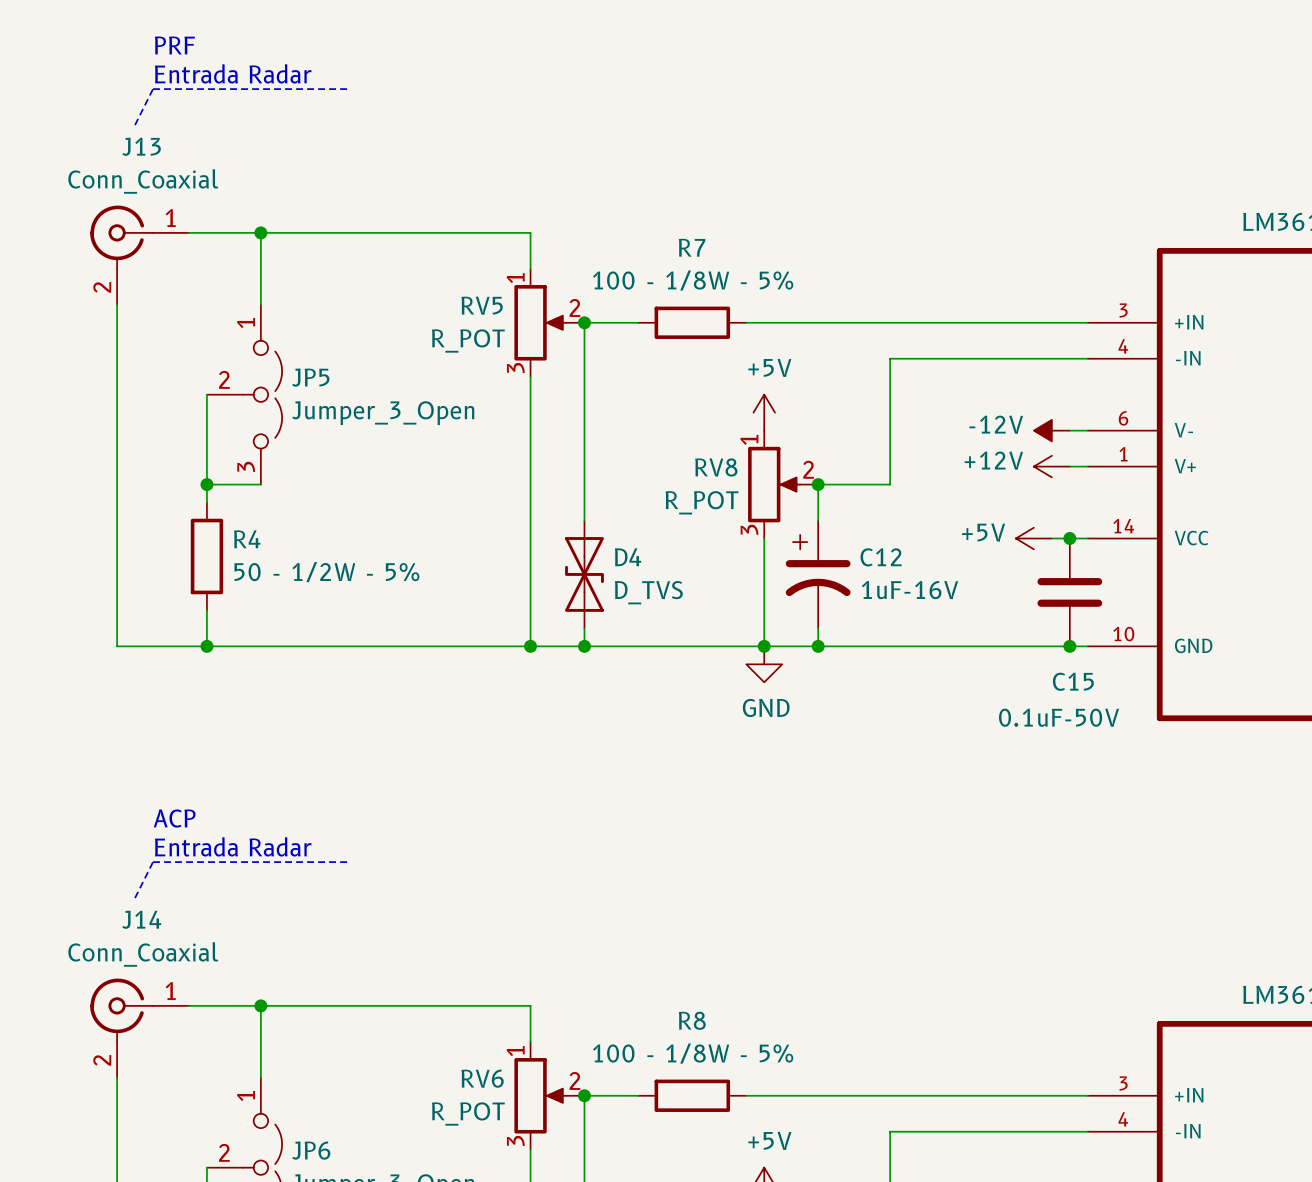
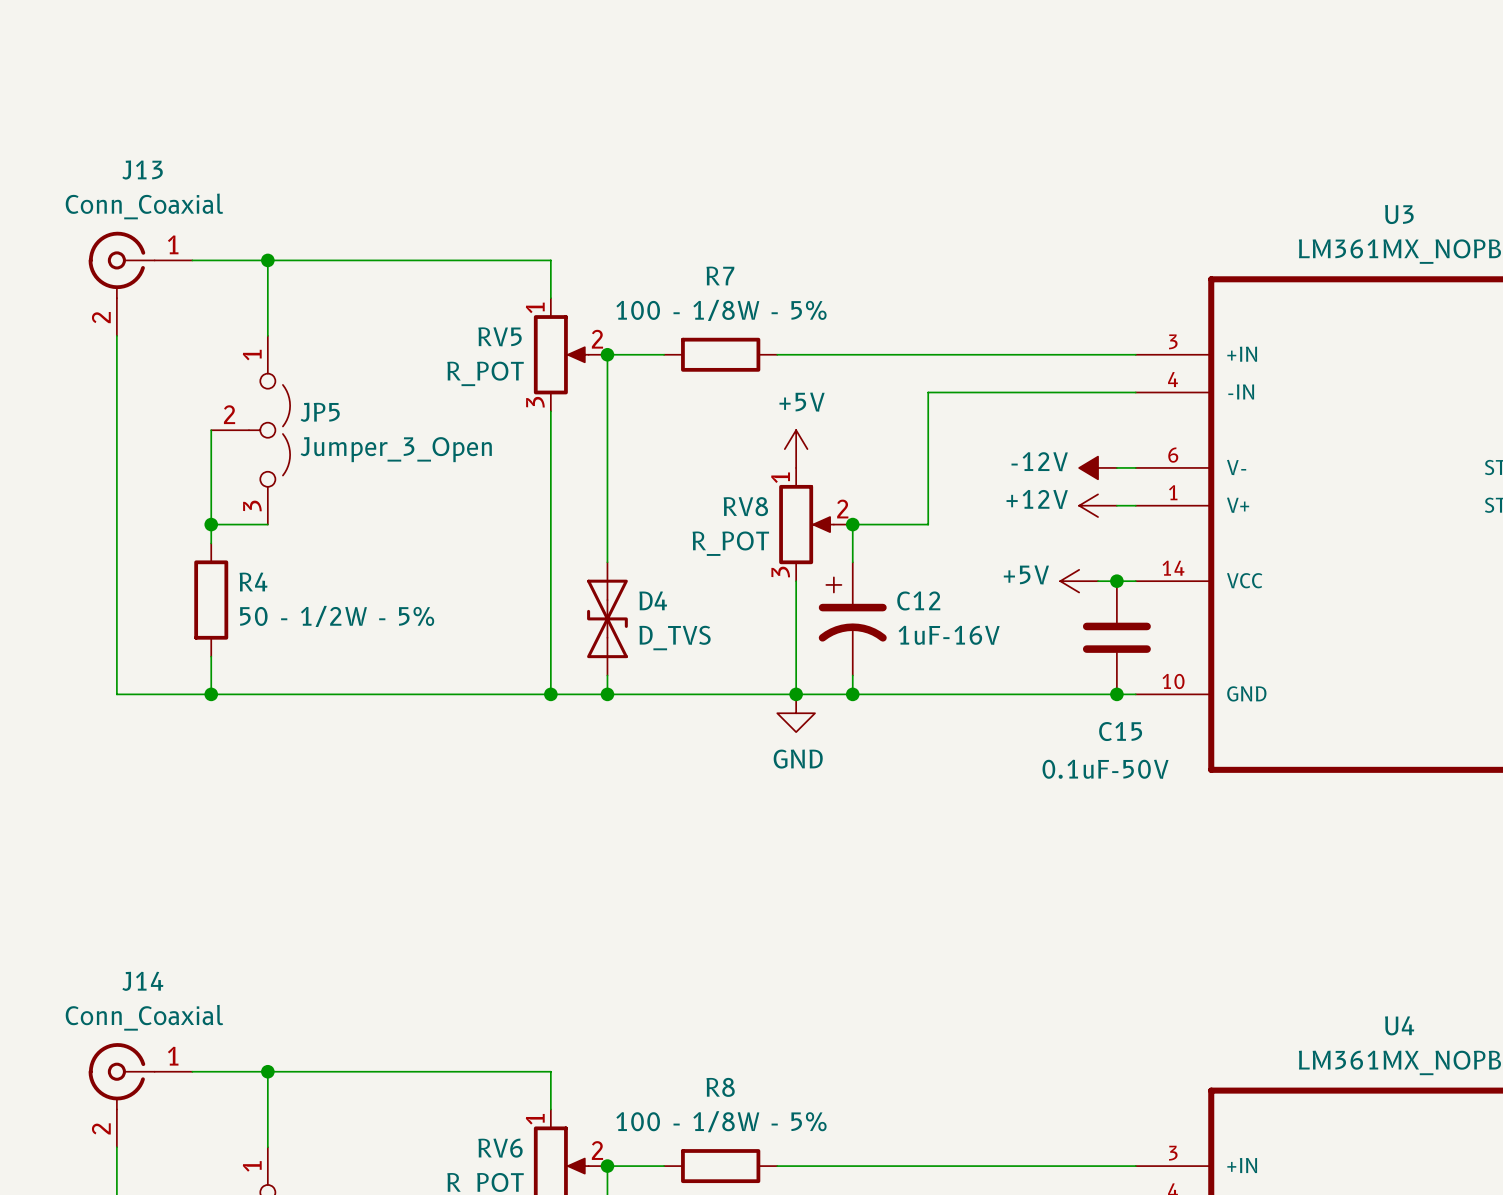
text: PRF (174, 45) -> none
text: Entrada Radar (233, 73) -> none
line: (350, 89) (153, 89) (135, 125) -> none
text: ACP (174, 818) -> none
text: Entrada Radar (233, 846) -> none
line: (350, 862) (153, 862) (135, 898) -> none

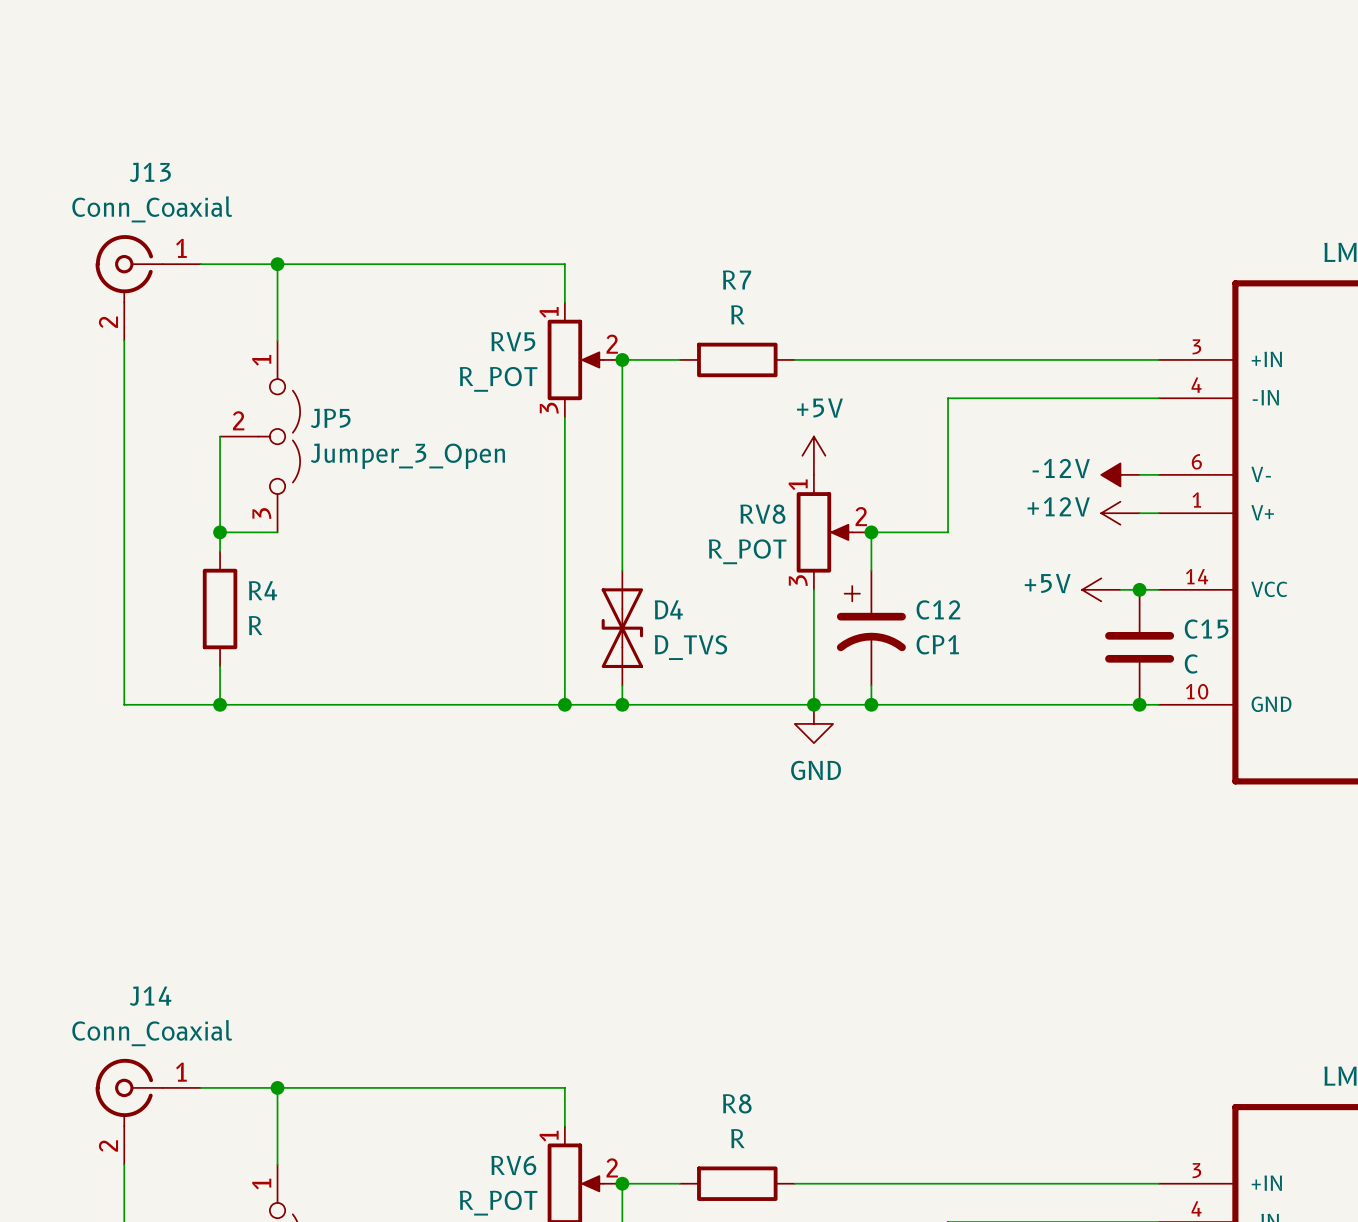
R7 value: 100 - 1/8W - 5% (721, 310) -> R (737, 314)
R4 value: 50 - 1/2W - 5% (337, 616) -> R (255, 625)
C12 value: 1uF-16V (949, 635) -> CP1 (937, 644)
C15 name position: C15 (1120, 731) -> C15 (1206, 629)
C15 value: 0.1uF-50V (1105, 769) -> C (1191, 663)
R8 value: 100 - 1/8W - 5% (721, 1121) -> R (737, 1138)

